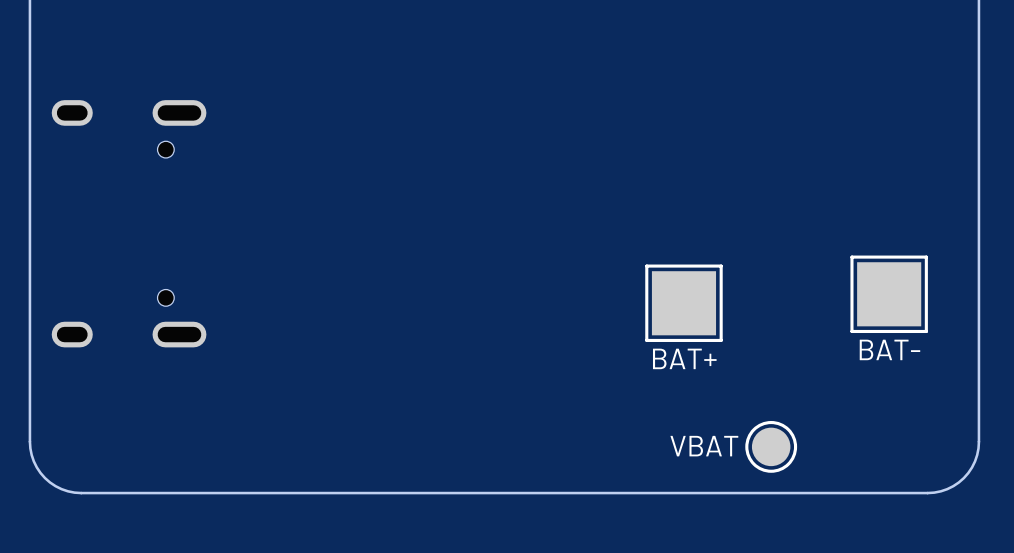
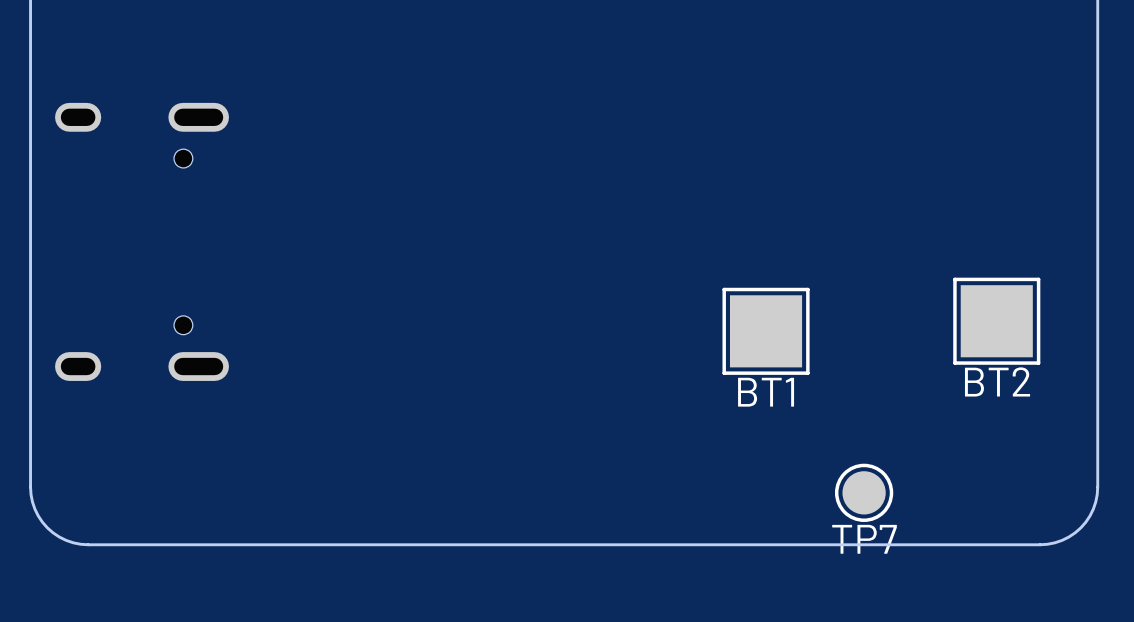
BT2 name: none -> BT2 (997, 381)
text: BAT- (889, 349) -> none
BT1 name: none -> BT1 (766, 392)
text: BAT+ (684, 358) -> none
text: VBAT (704, 446) -> none
TP7 name: none -> TP7 (864, 539)

